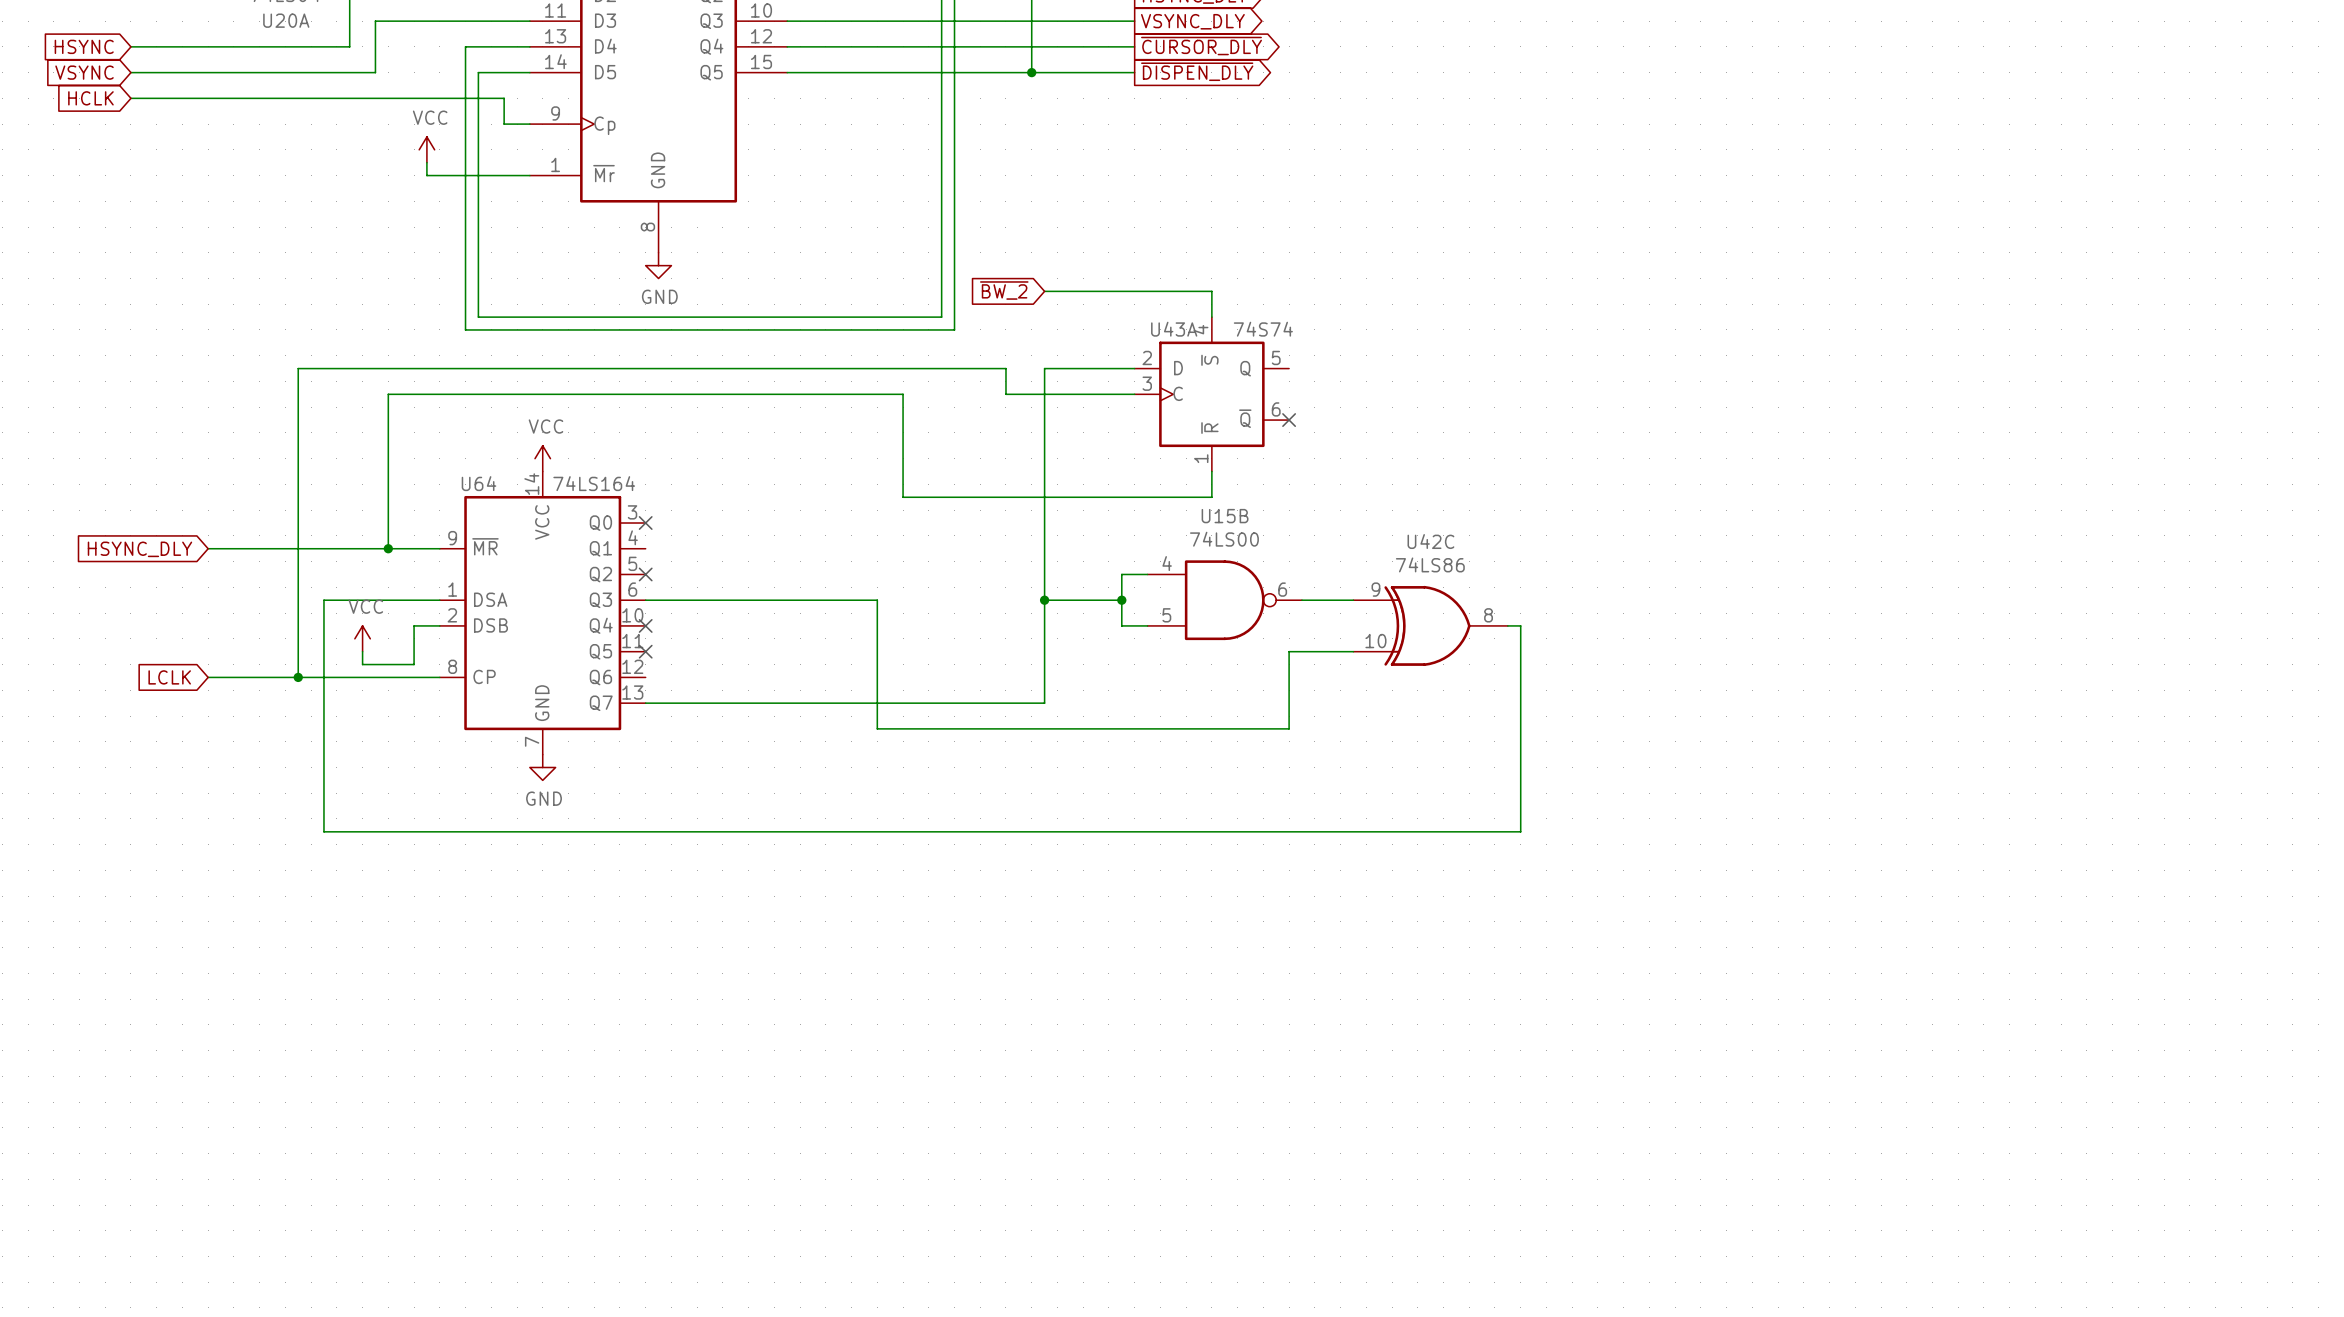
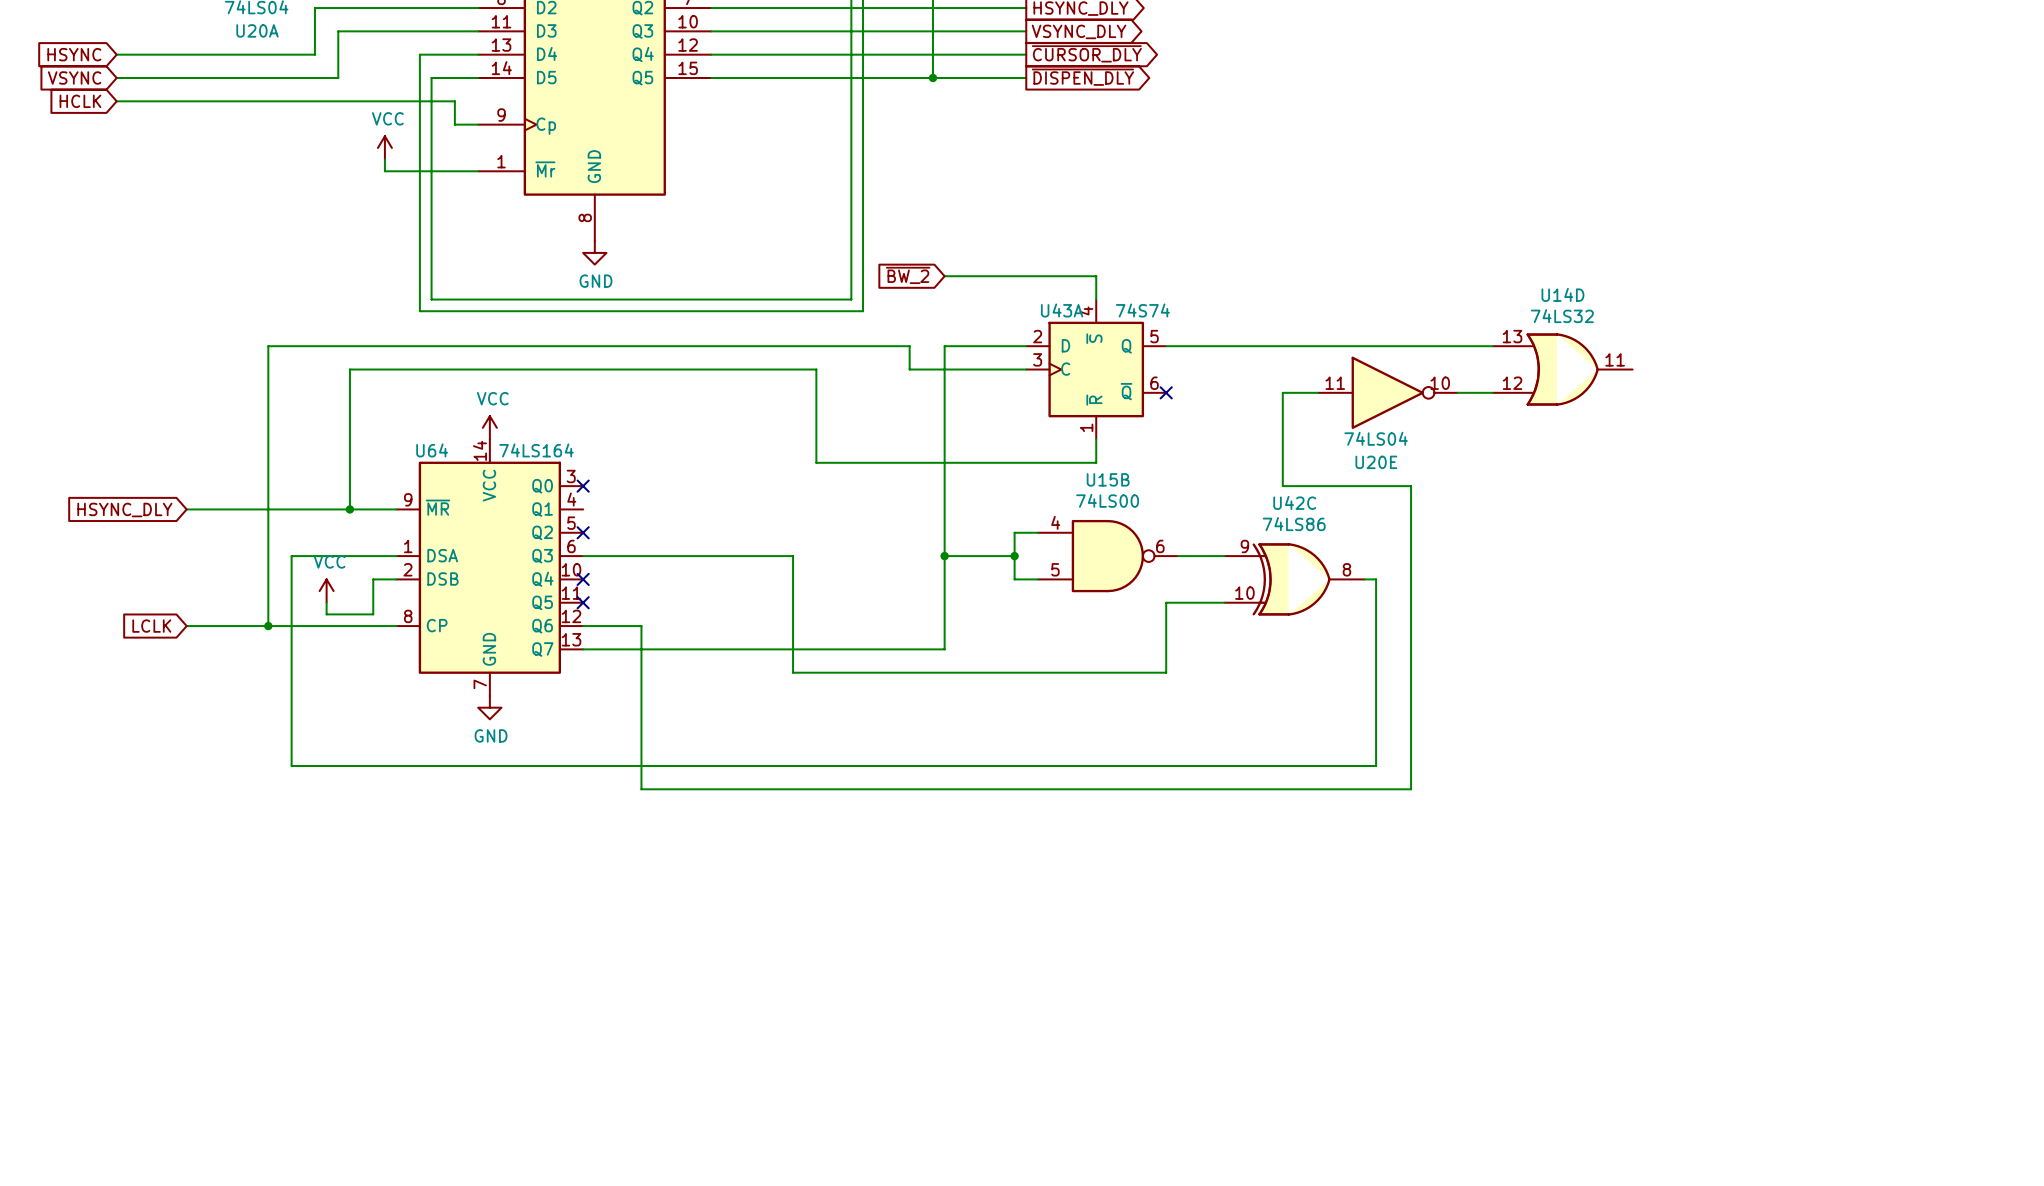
wire: none -> (1166, 346) (1492, 346)
U14D: none -> 74LS32 (1562, 369)
wire: none -> (1317, 392) (1282, 392) (1282, 486) (1411, 486) (1411, 789) (641, 789) (641, 626) (583, 626)
U20E: none -> 74LS04 (1387, 392)
wire: none -> (1457, 392) (1492, 392)

